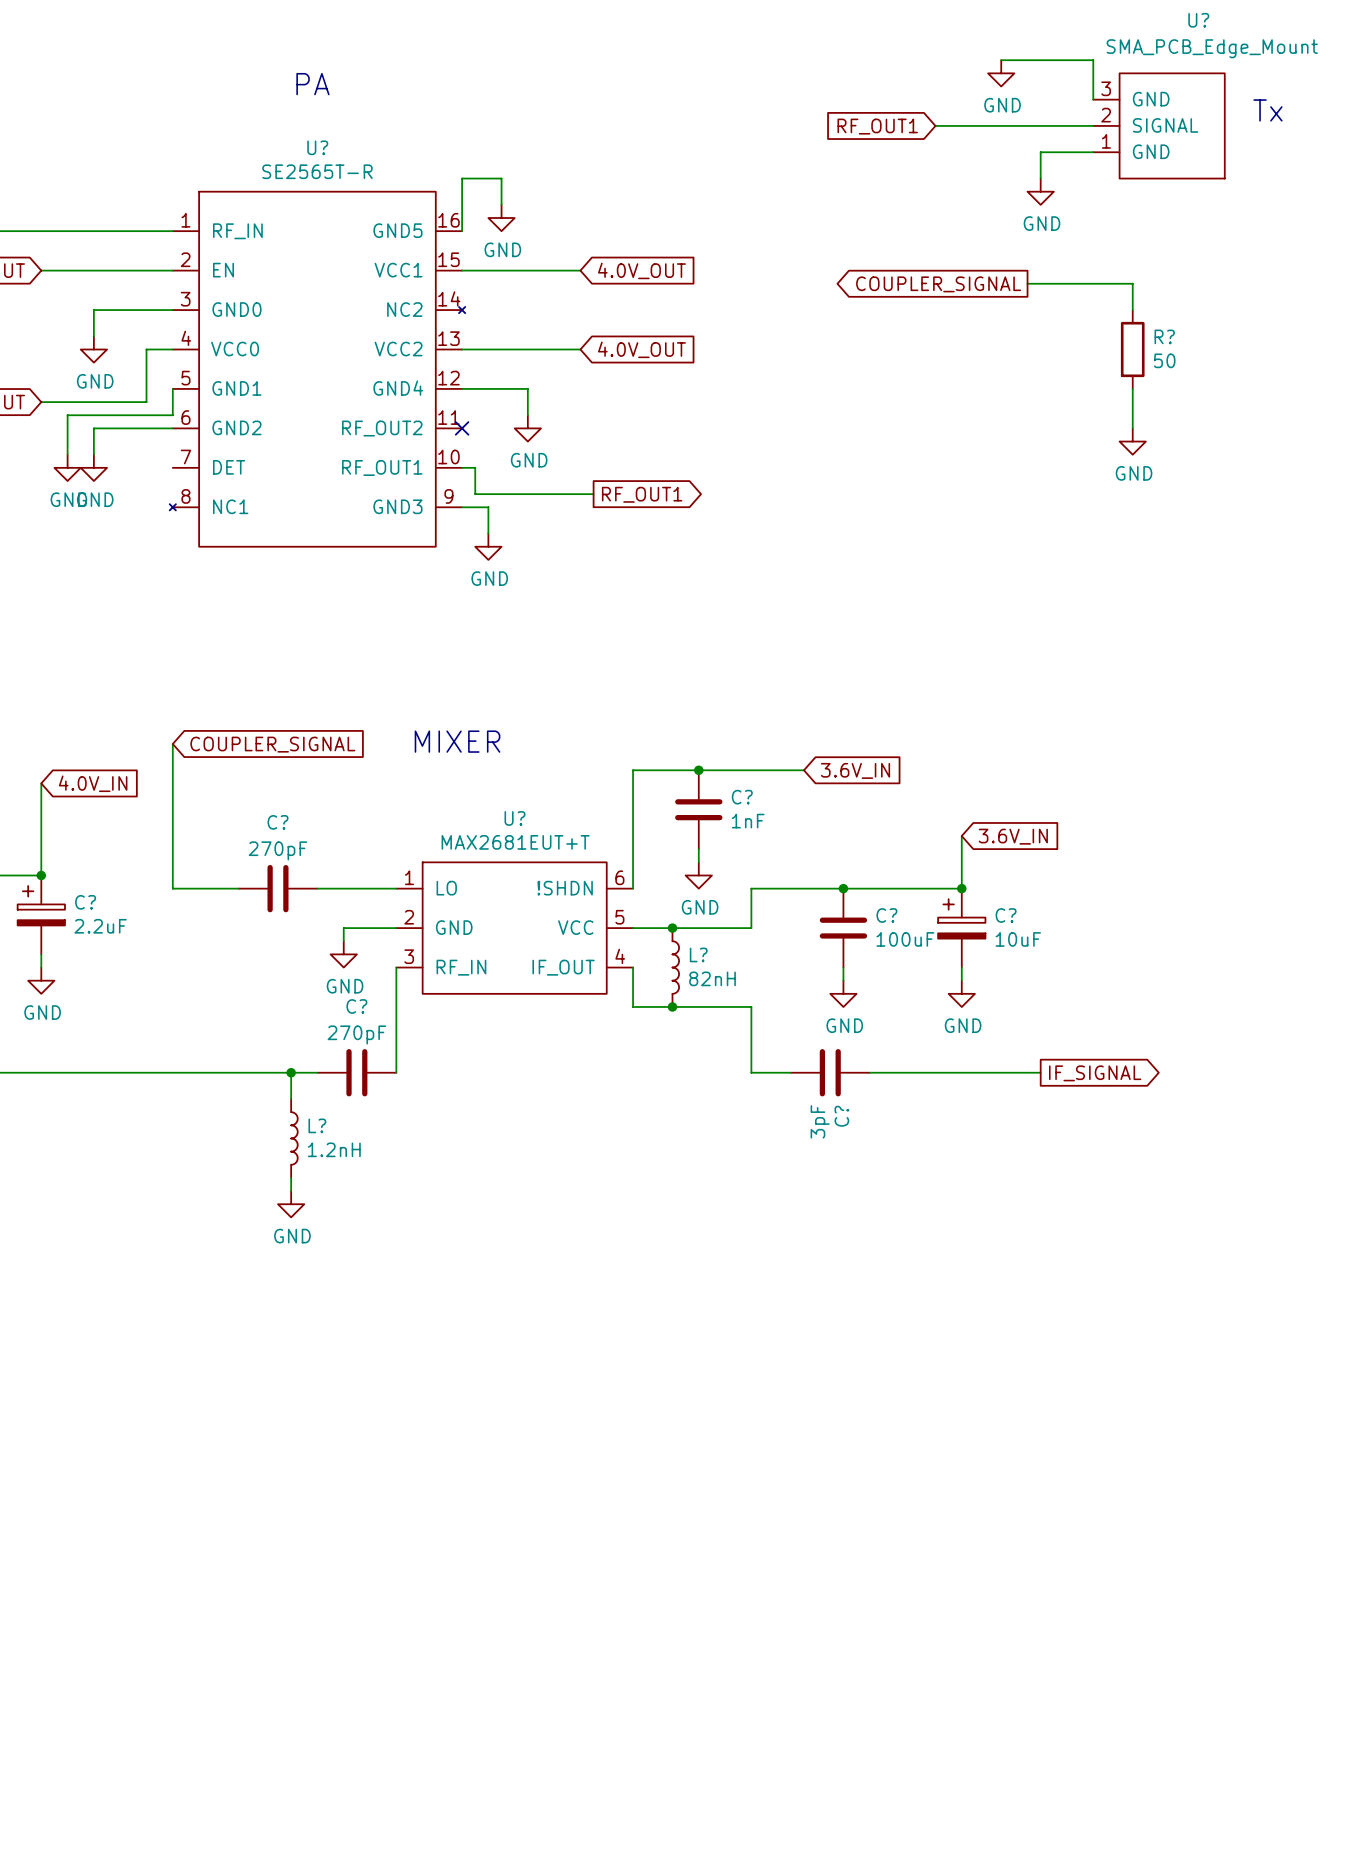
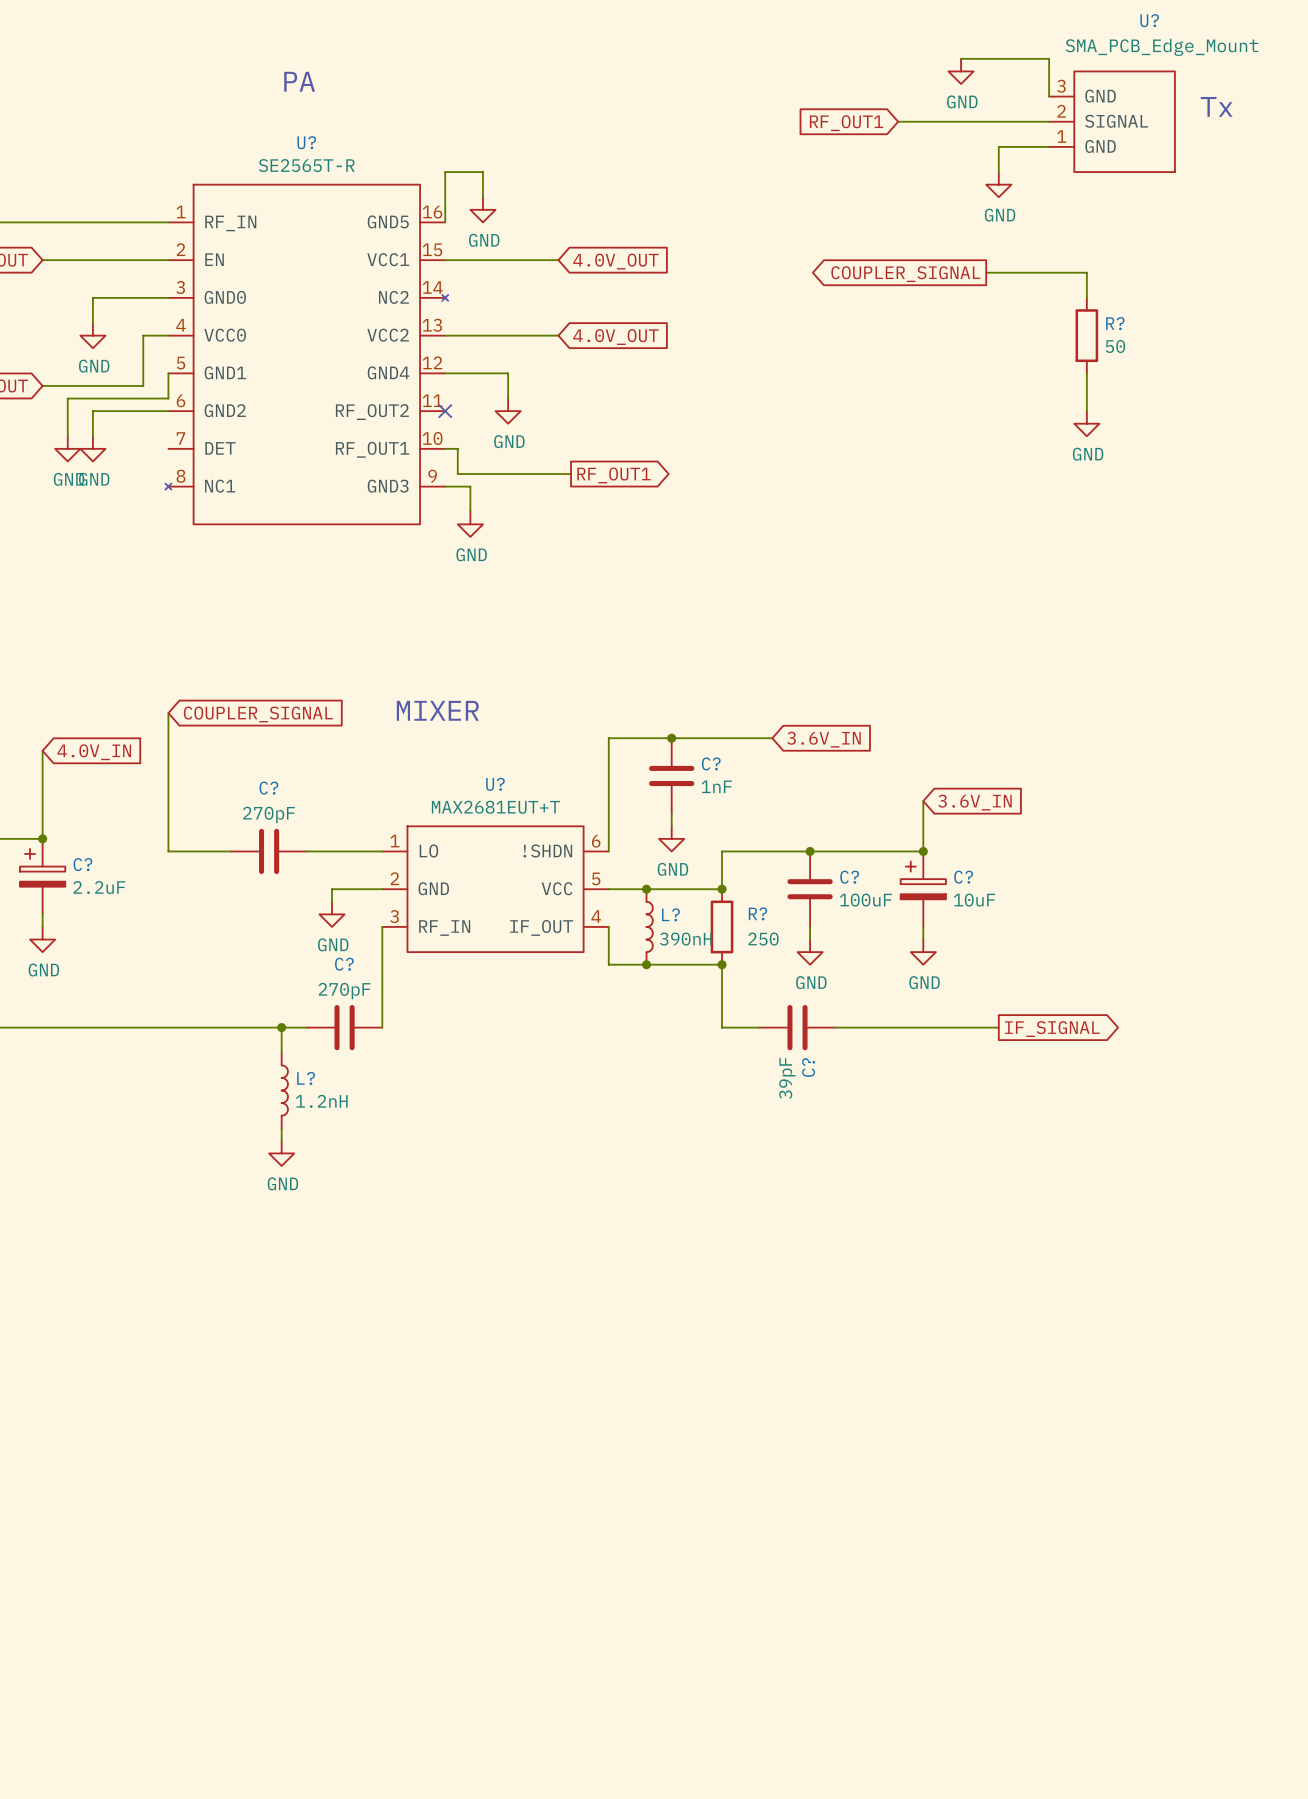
junction: none -> (722, 889)
R?: none -> 250 (722, 926)
L? value: 82nH (712, 978) -> 390nH (685, 939)
junction: none -> (722, 964)
C? value: 3pF (820, 1121) -> 39pF (787, 1078)

